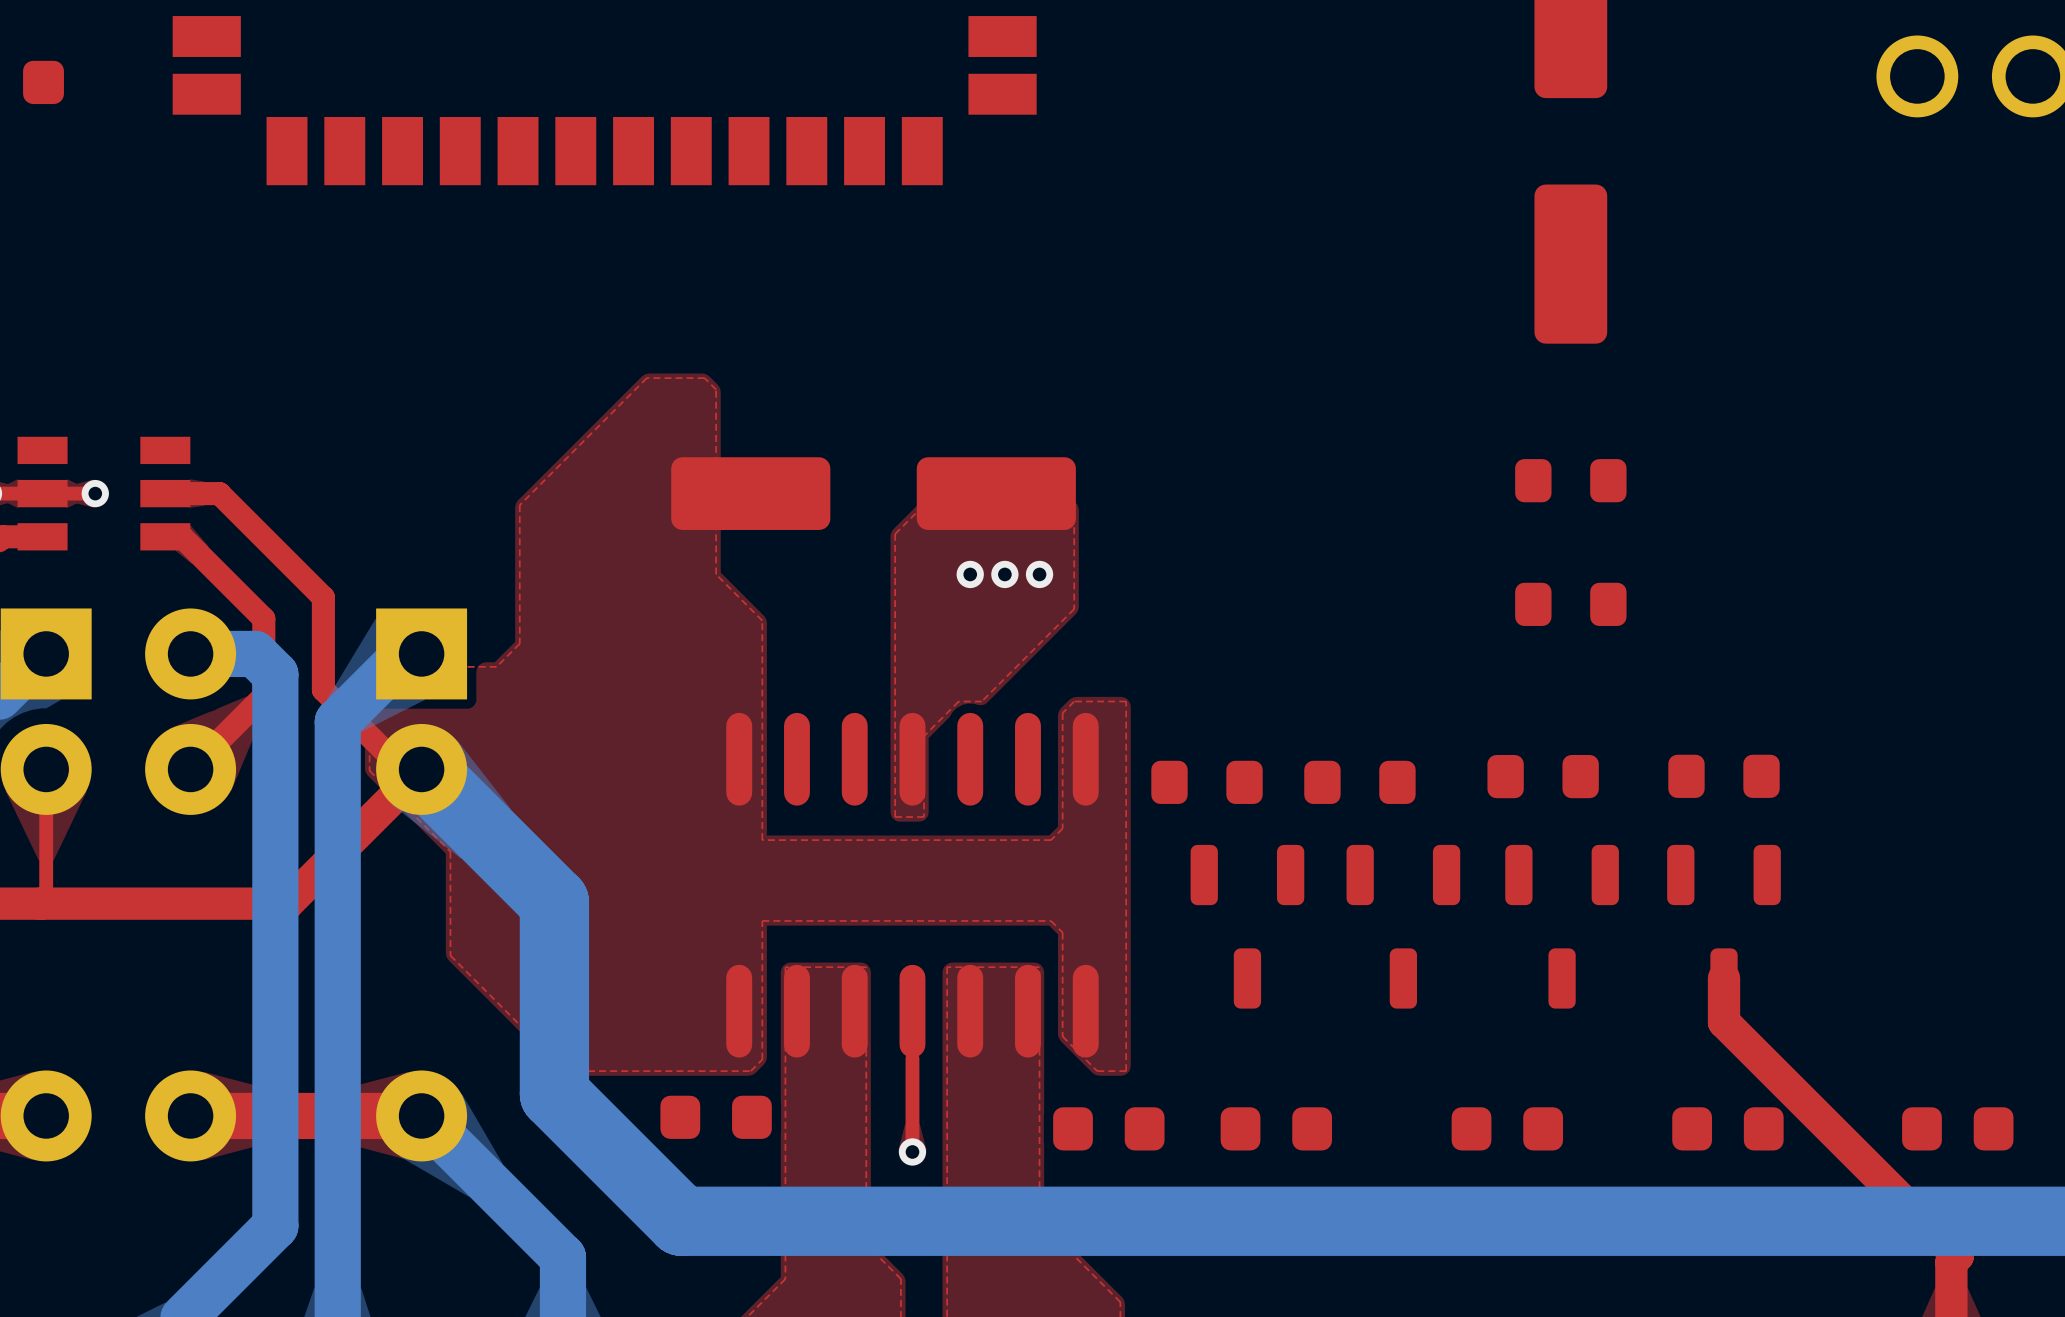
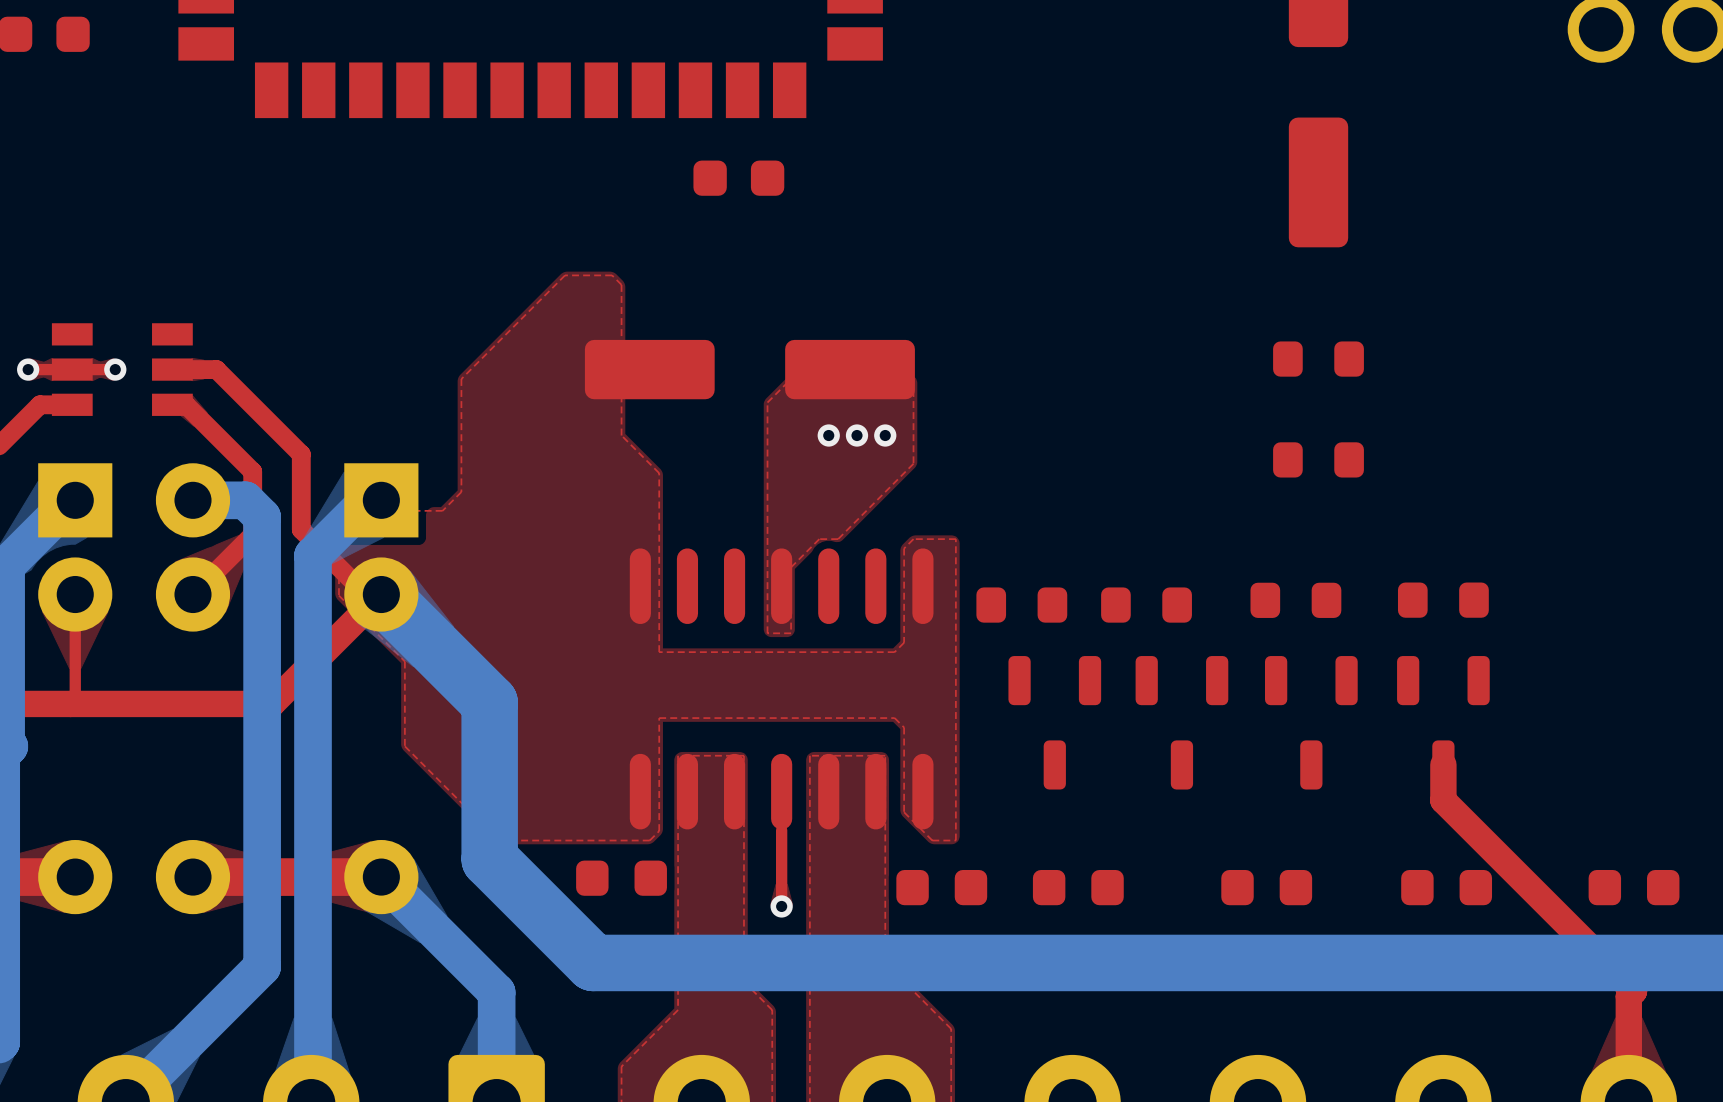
part: none -> (738, 178)

